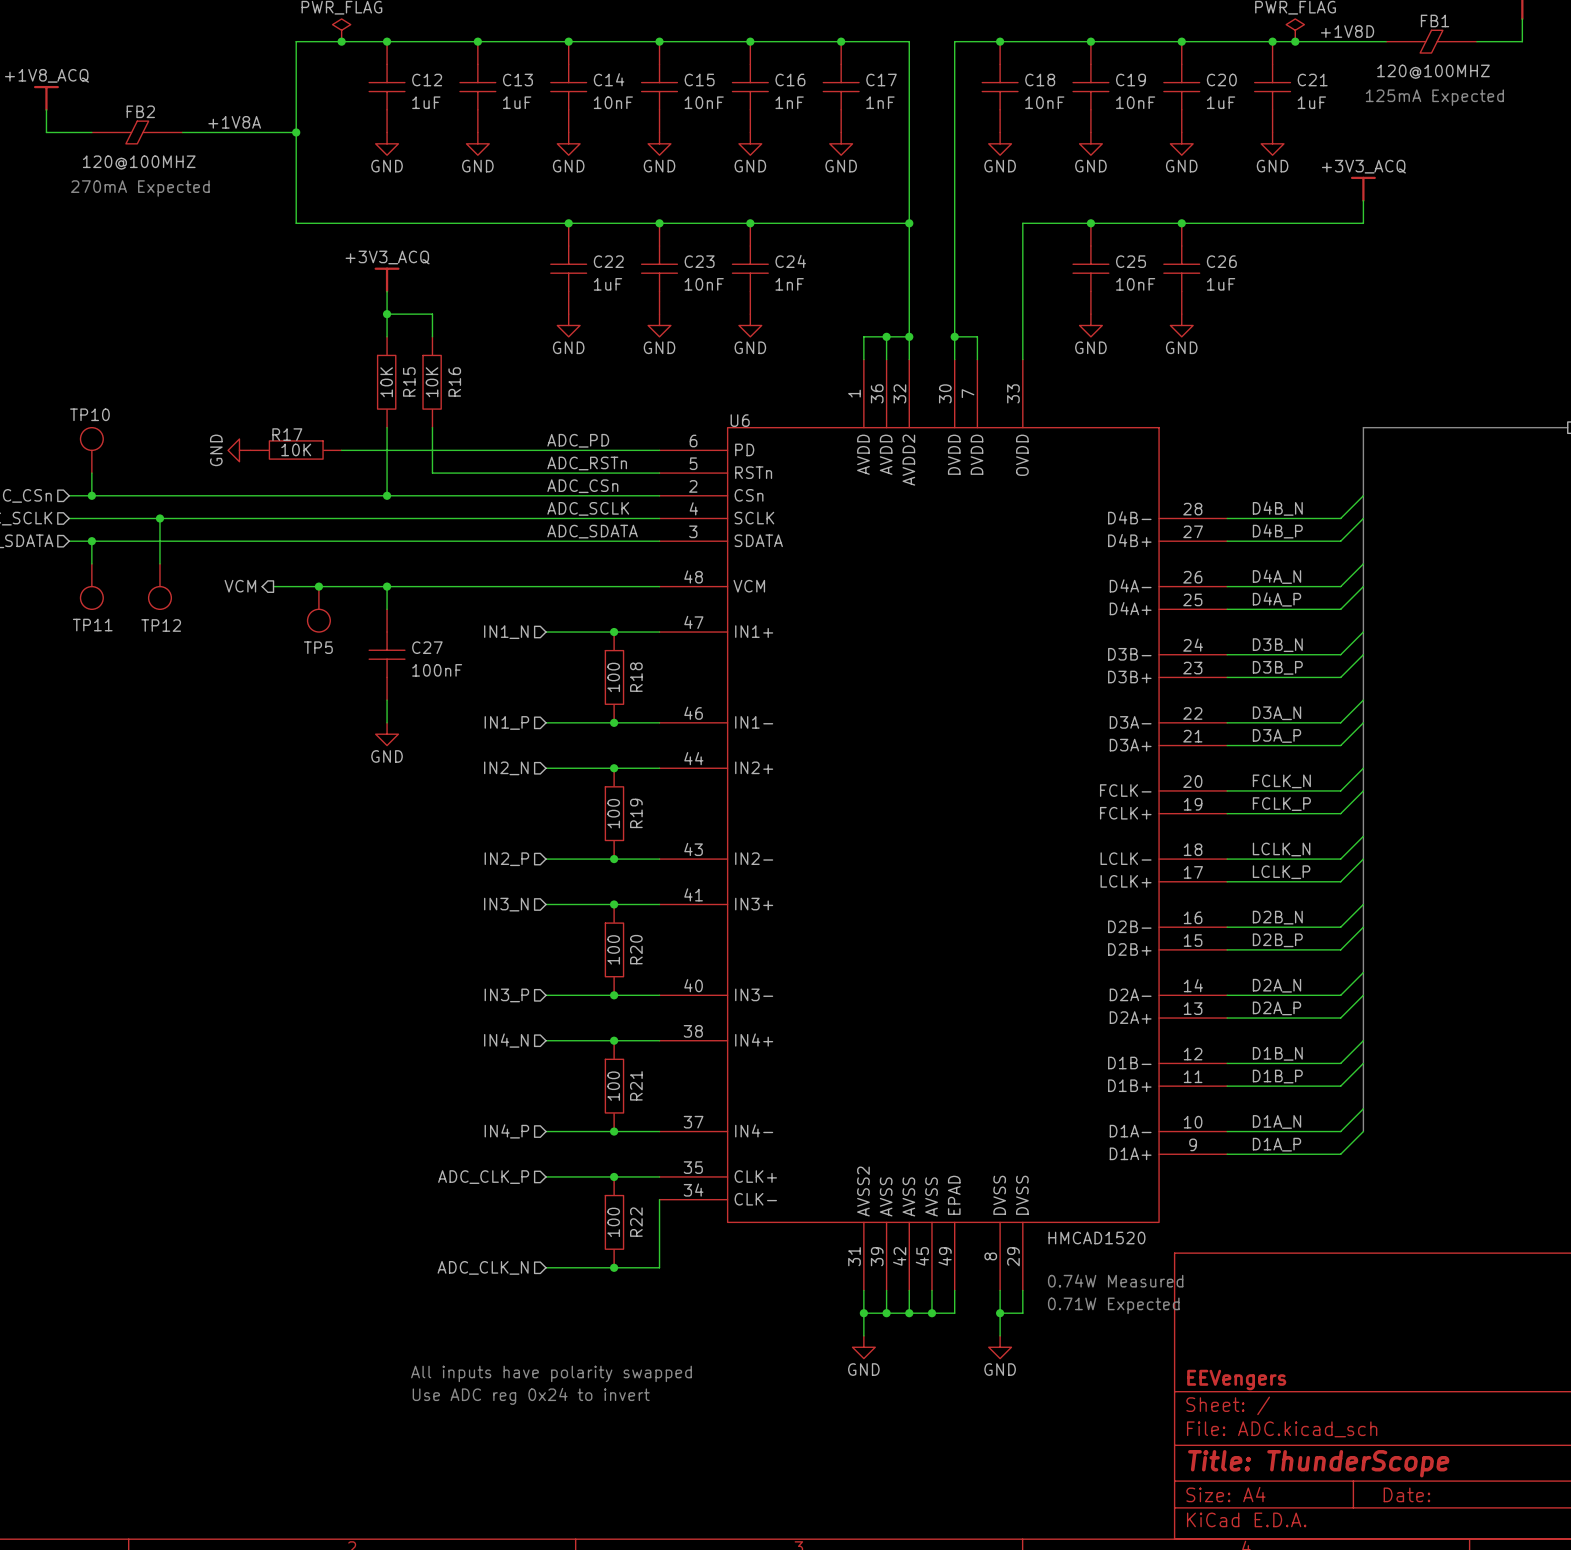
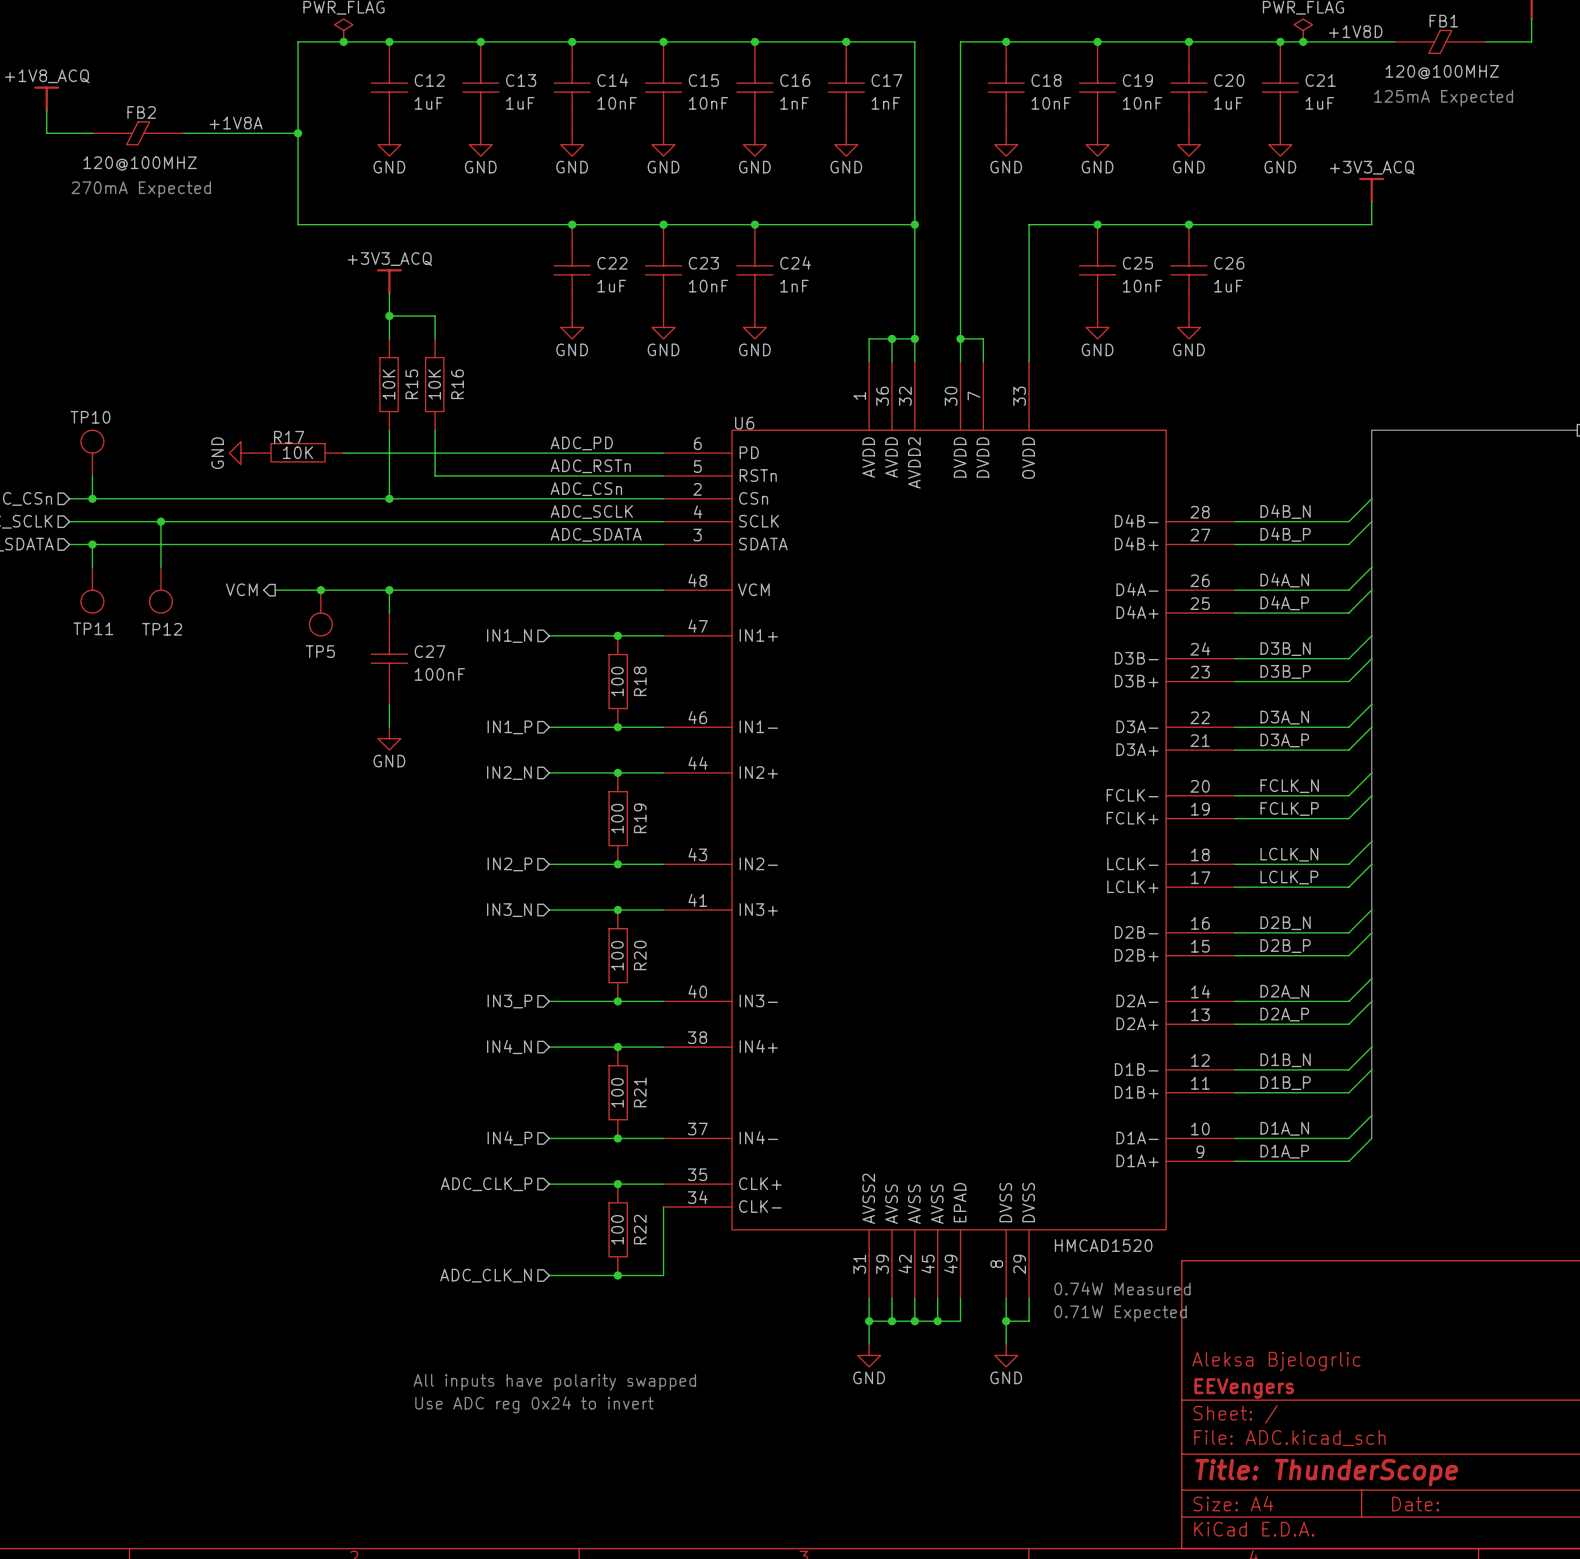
title block: none -> Aleksa Bjelogrlic (1276, 1361)

